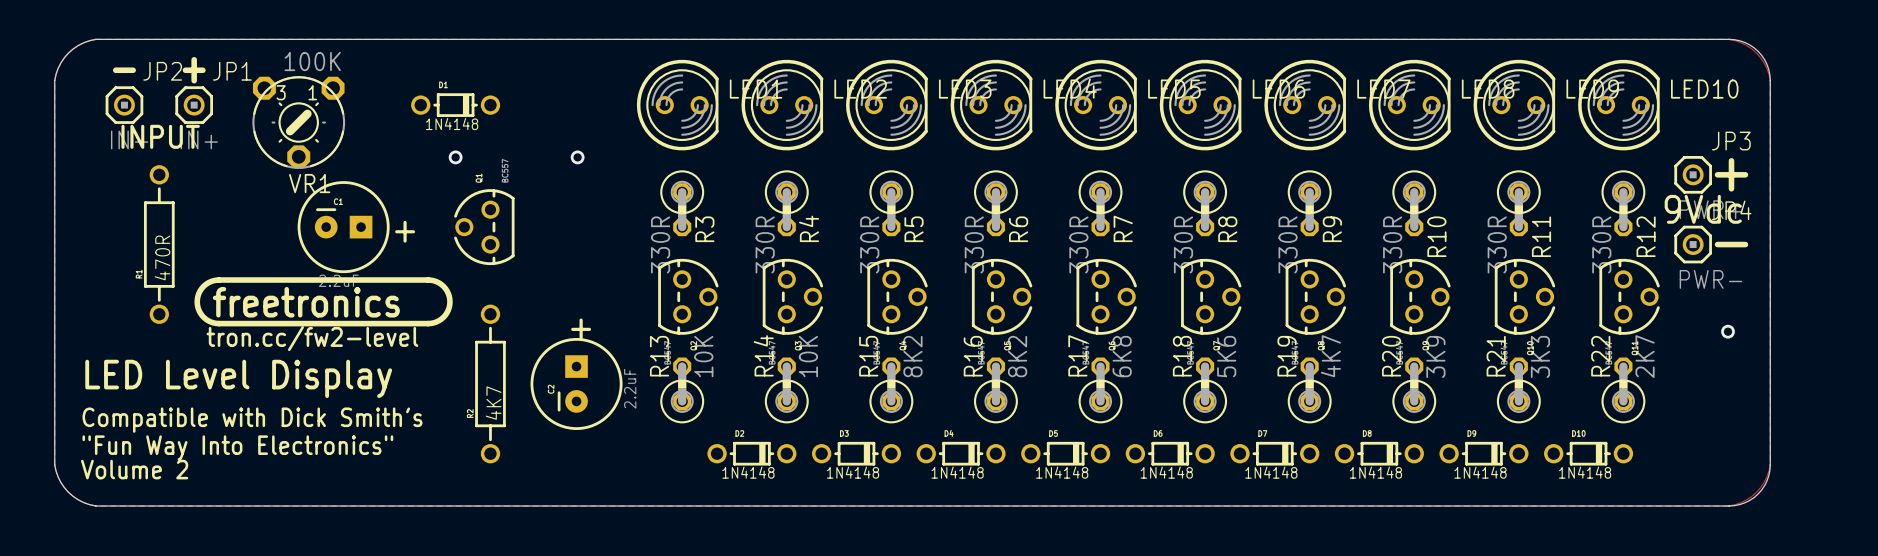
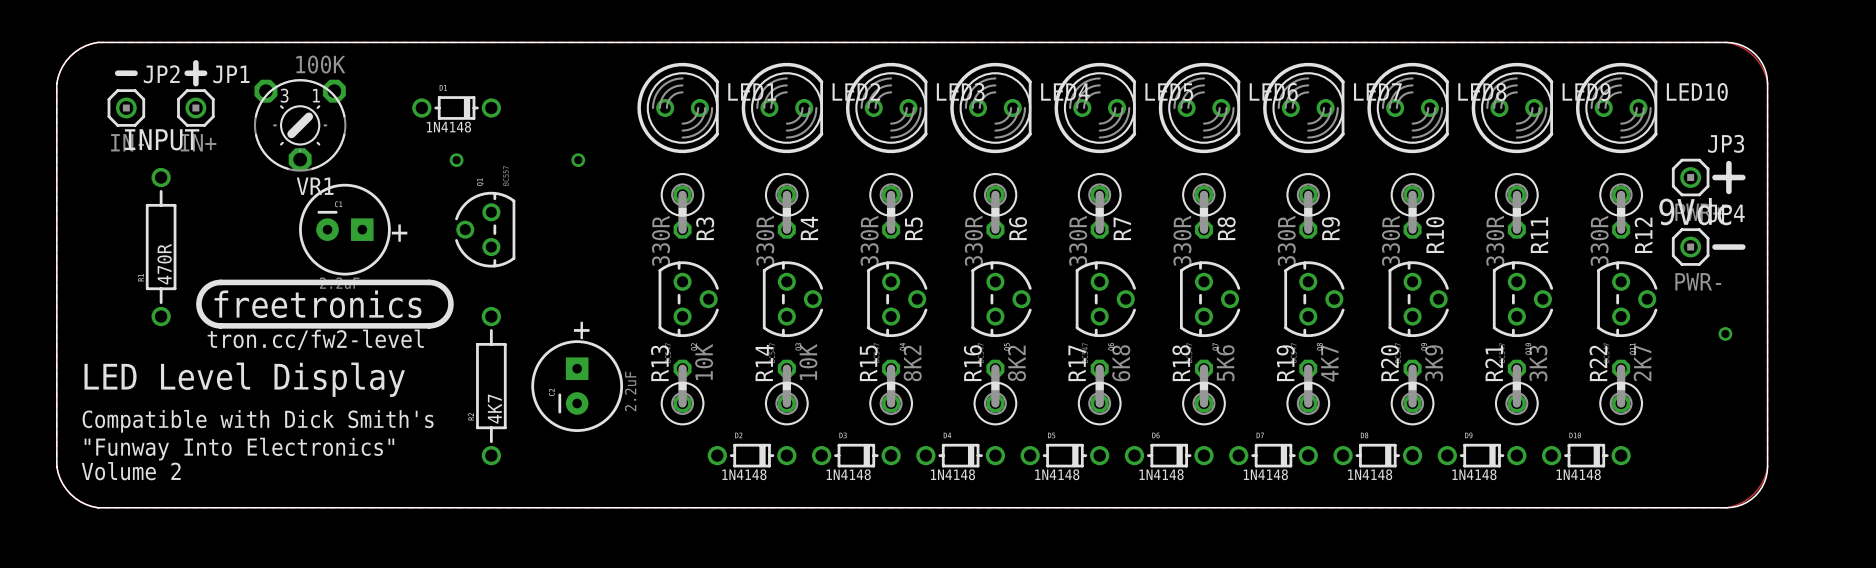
text: "Fun Way Into Electronics" (237, 448) -> "Funway Into Electronics" (239, 449)

